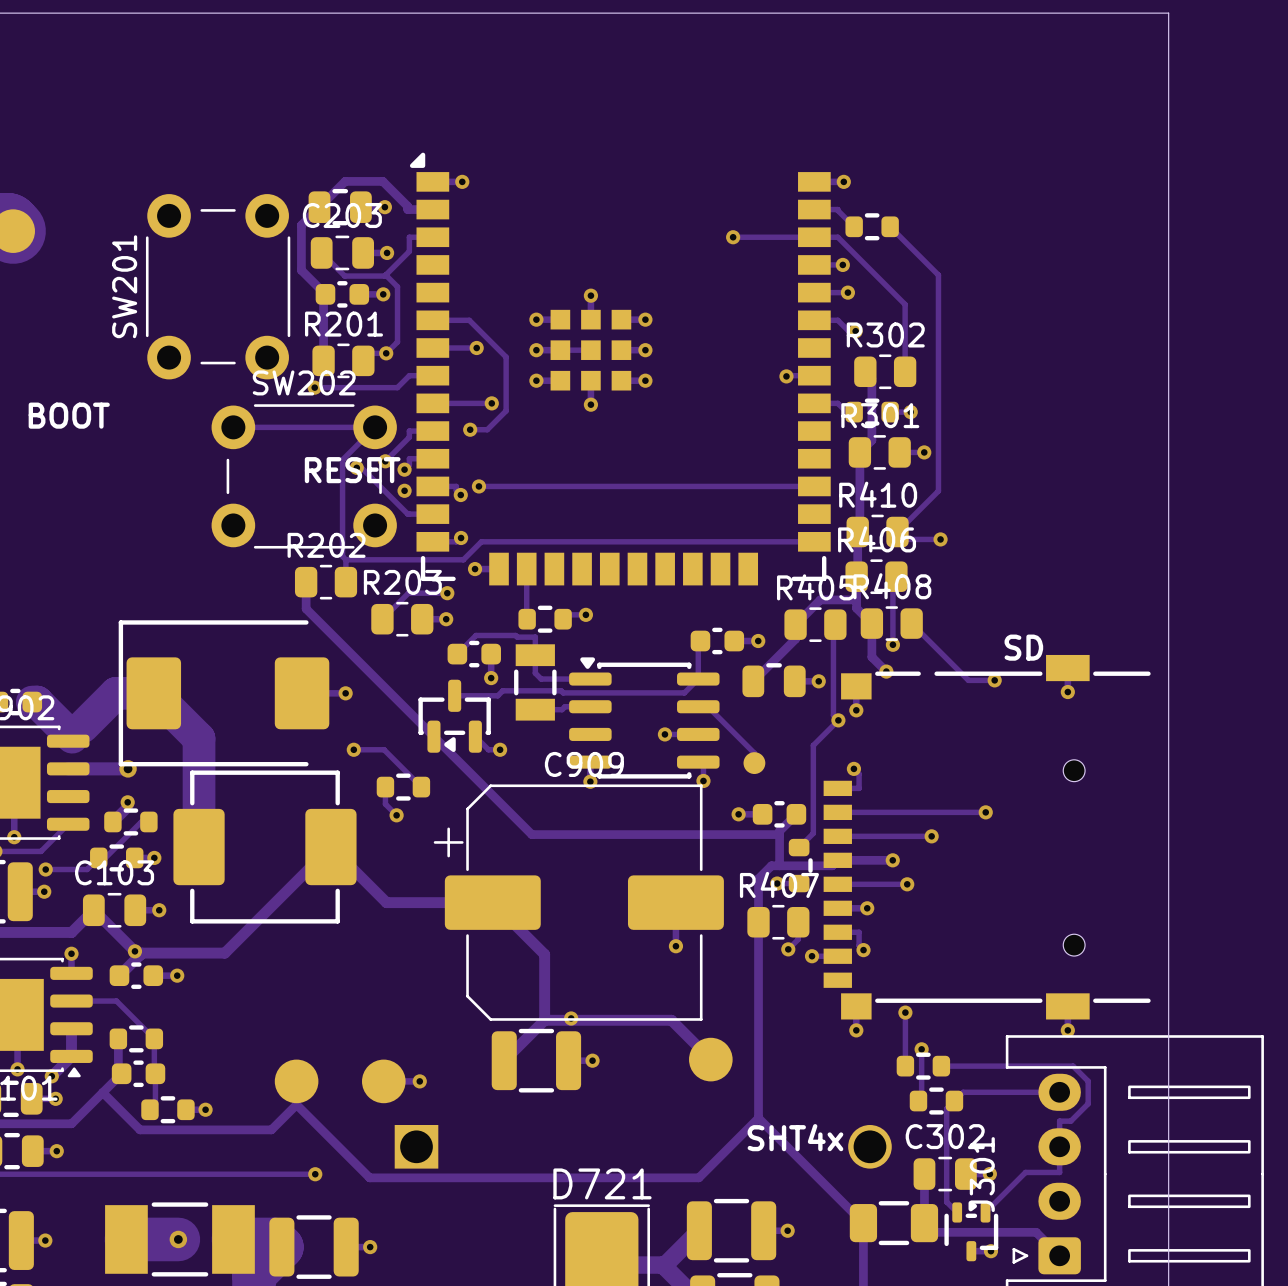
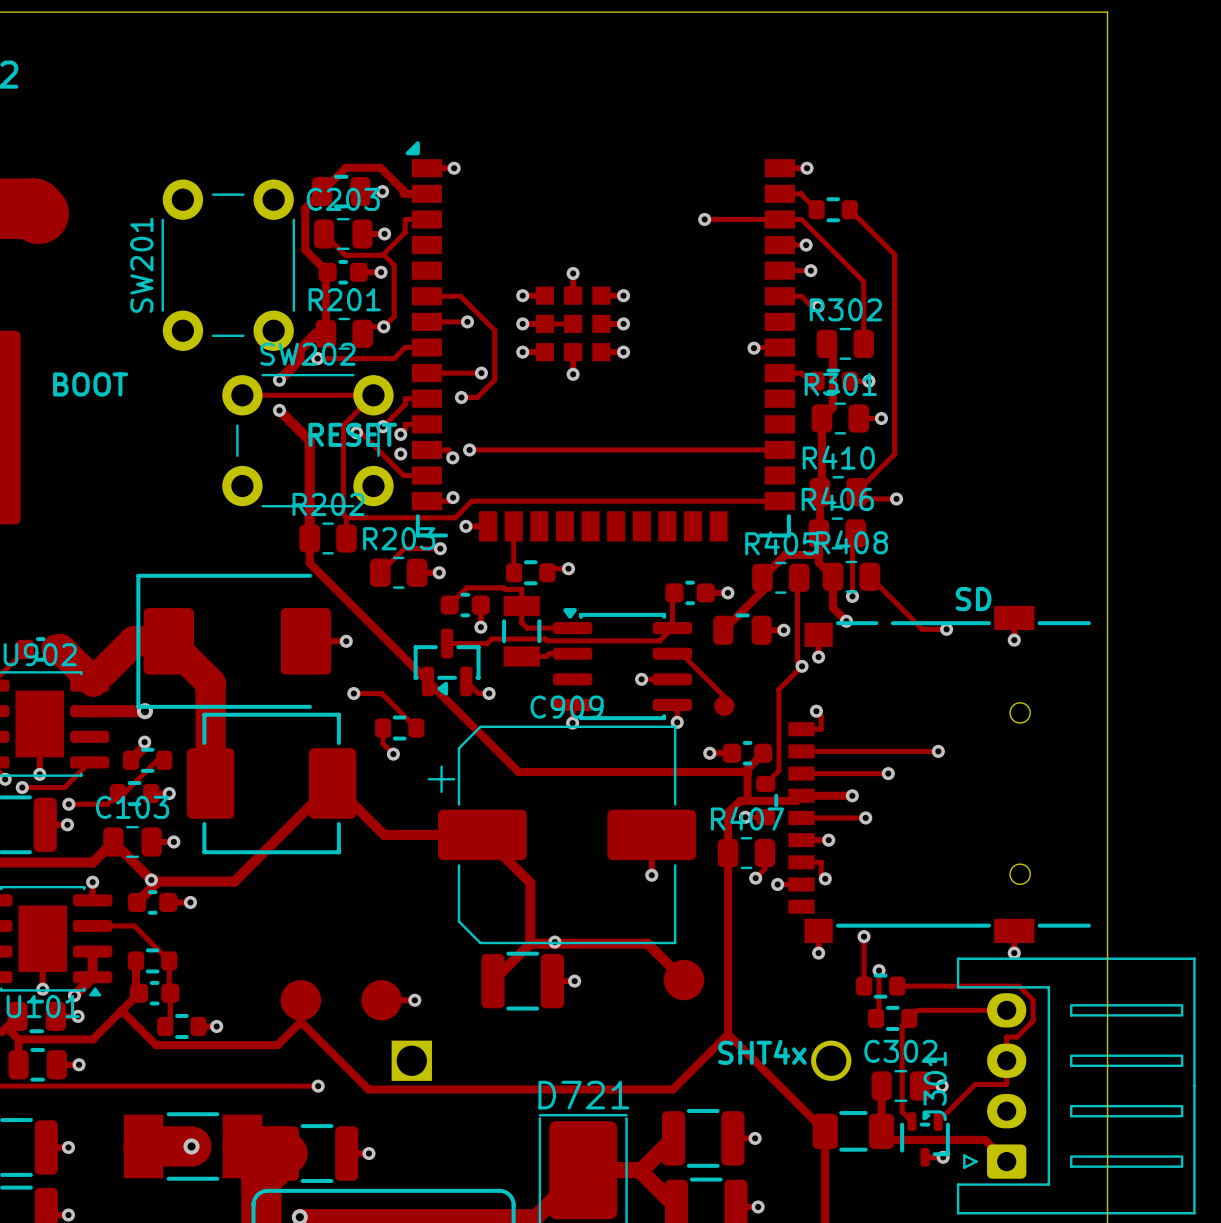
track: none -> (325, 333) (315, 333) (299, 349) (299, 360) (279, 380)
via: none -> (279, 380)
track: none -> (279, 410) (309, 440) (309, 538)
via: none -> (279, 410)

